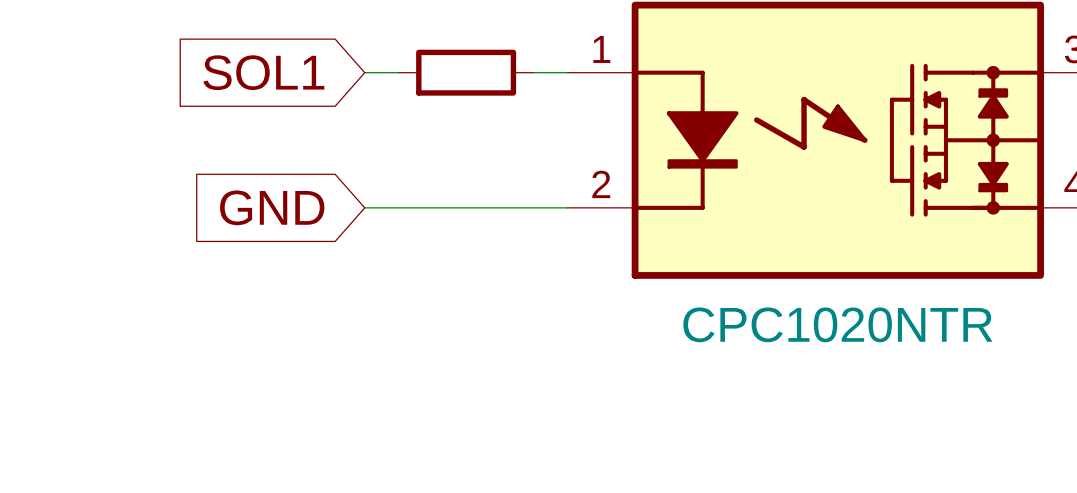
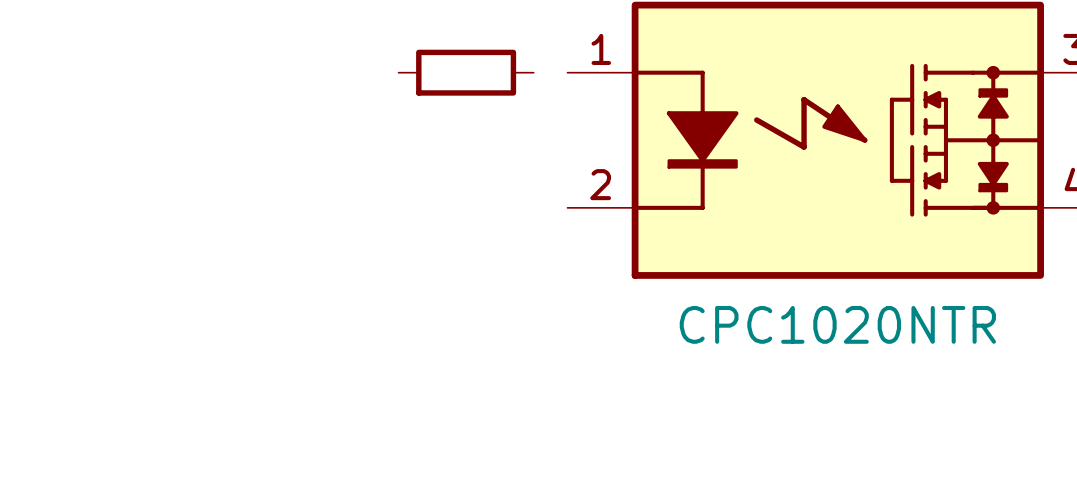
global label: SOL1 (263, 72) -> none
wire: (364, 72) (398, 72) -> none
wire: (533, 72) (567, 72) -> none
global label: GND (272, 207) -> none
wire: (364, 207) (567, 207) -> none

